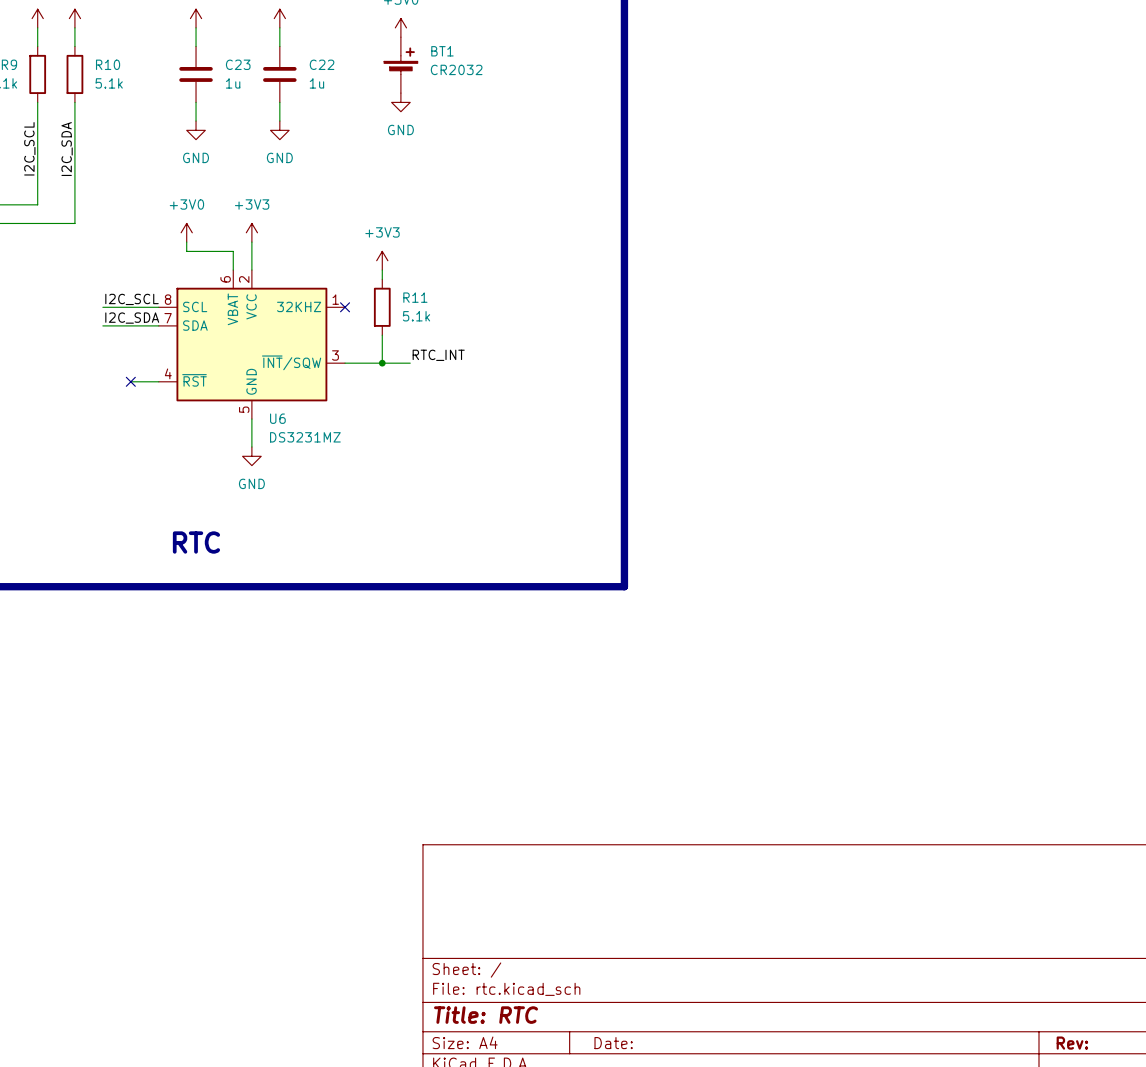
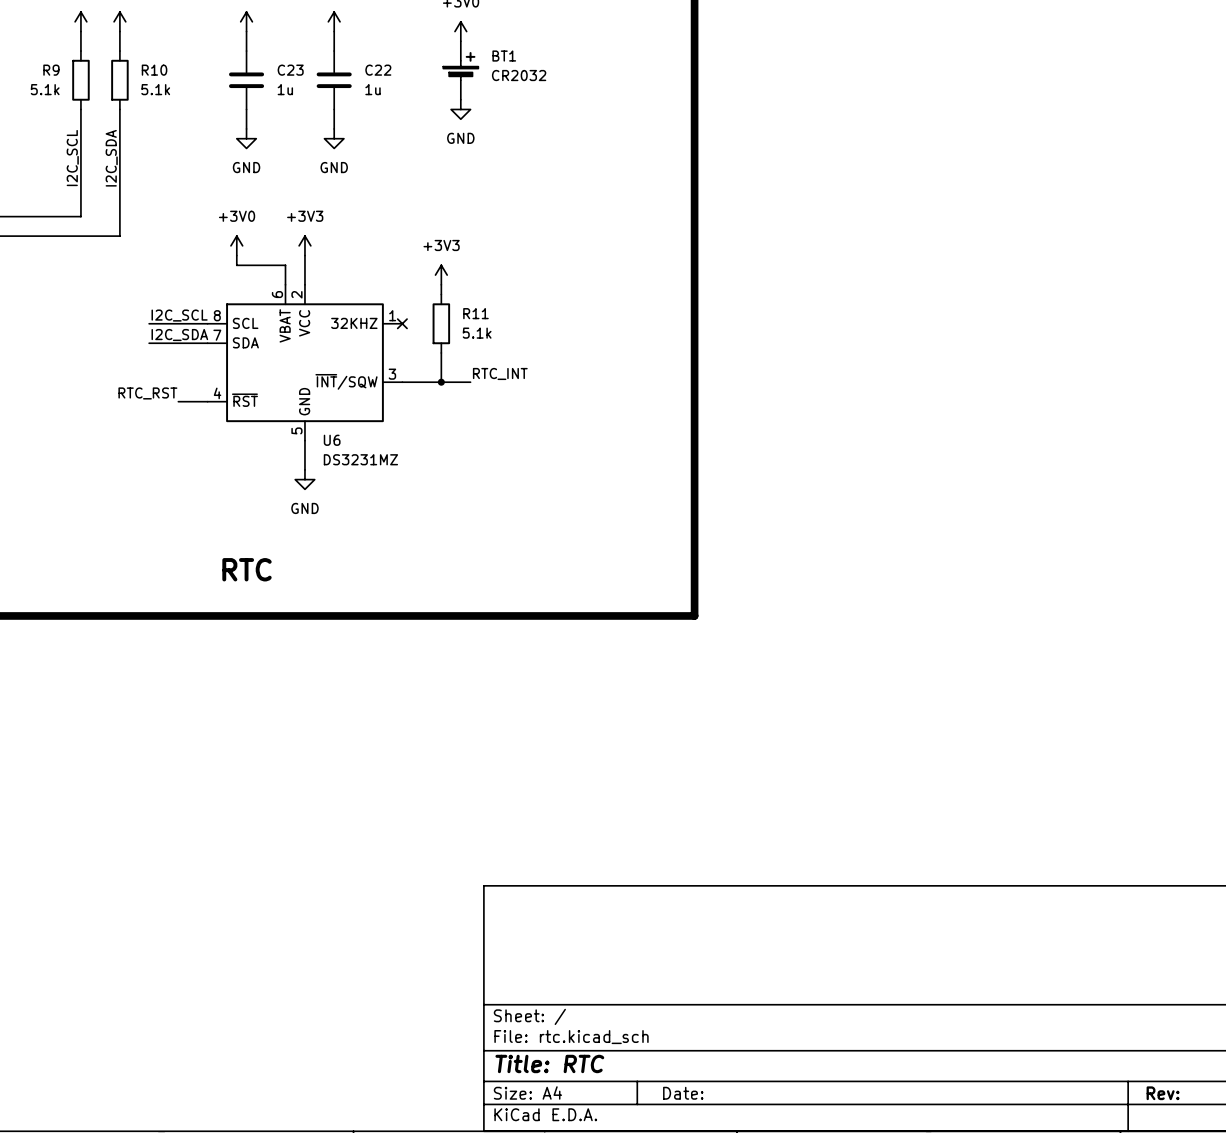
label: none -> RTC_RST (147, 393)
no-connect mark: (130, 381) -> none

